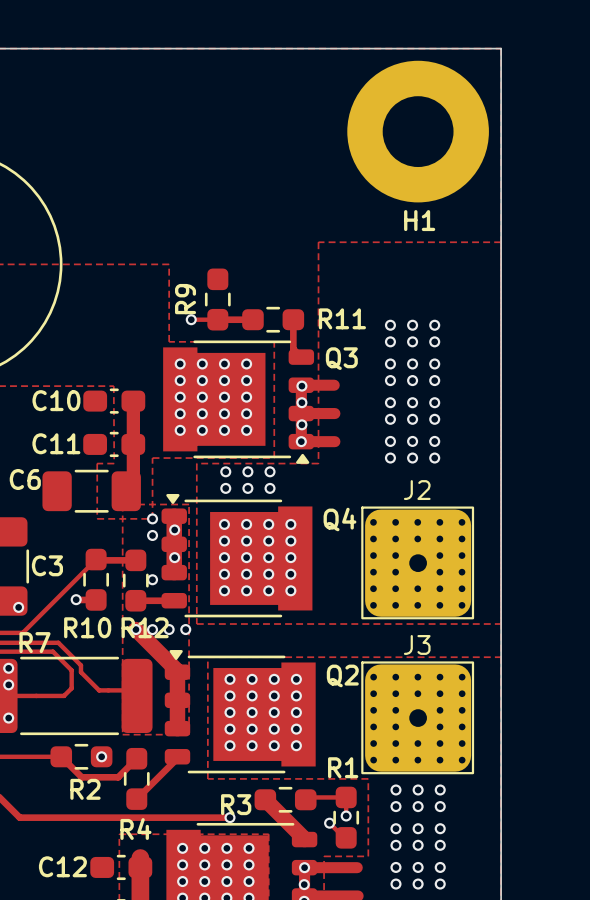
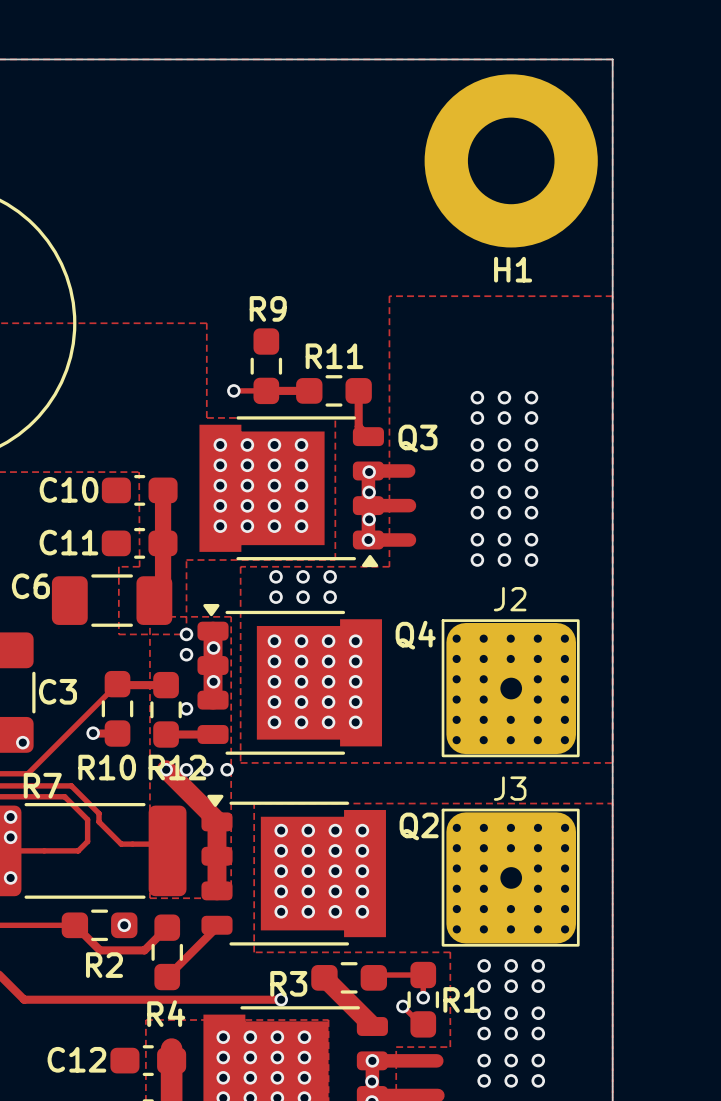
R9 name rotation: 0° (185, 299) -> 90° clockwise (268, 308)
R9 name position: R9 (185, 299) -> R9 (268, 308)
R11 name position: R11 (342, 318) -> R11 (334, 356)
R1 name position: R1 (343, 767) -> R1 (461, 999)

